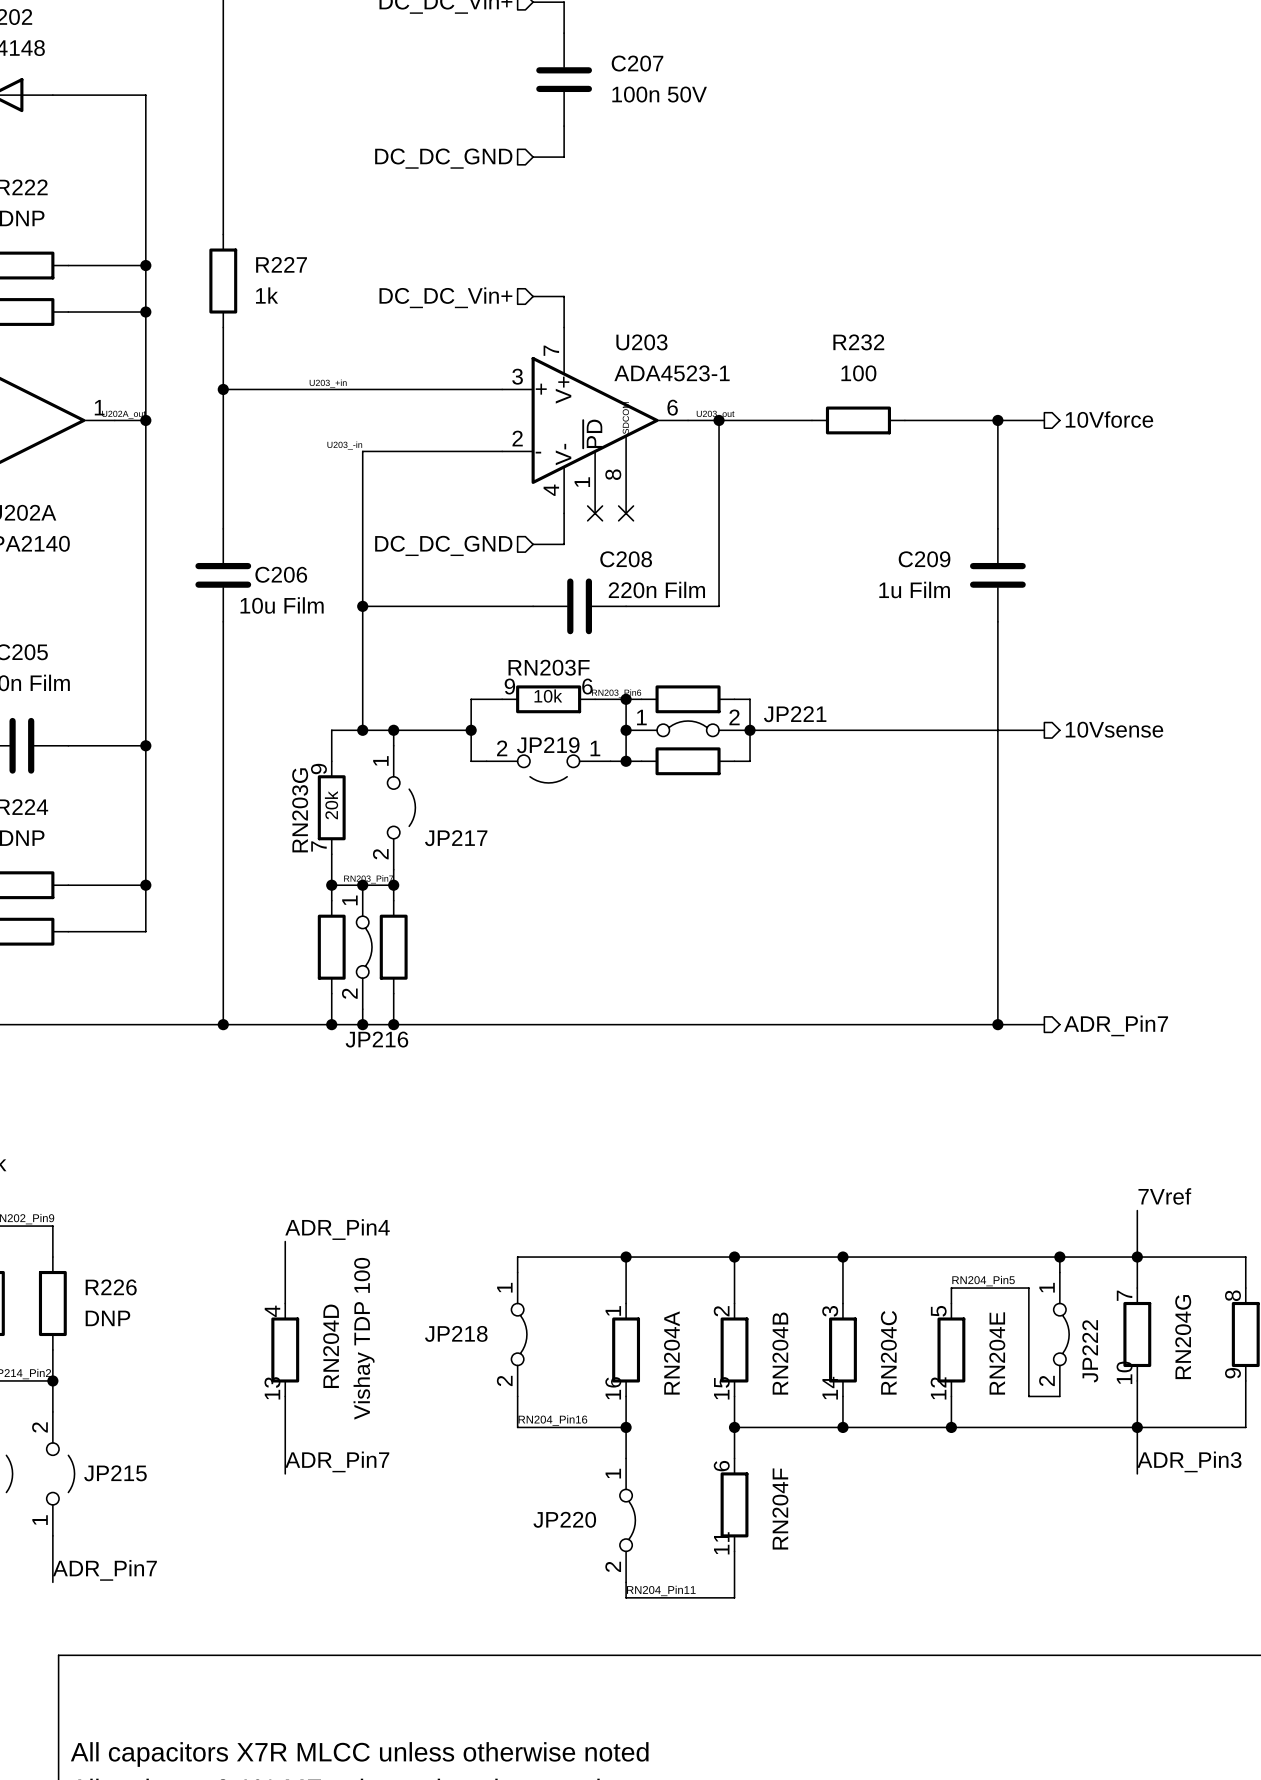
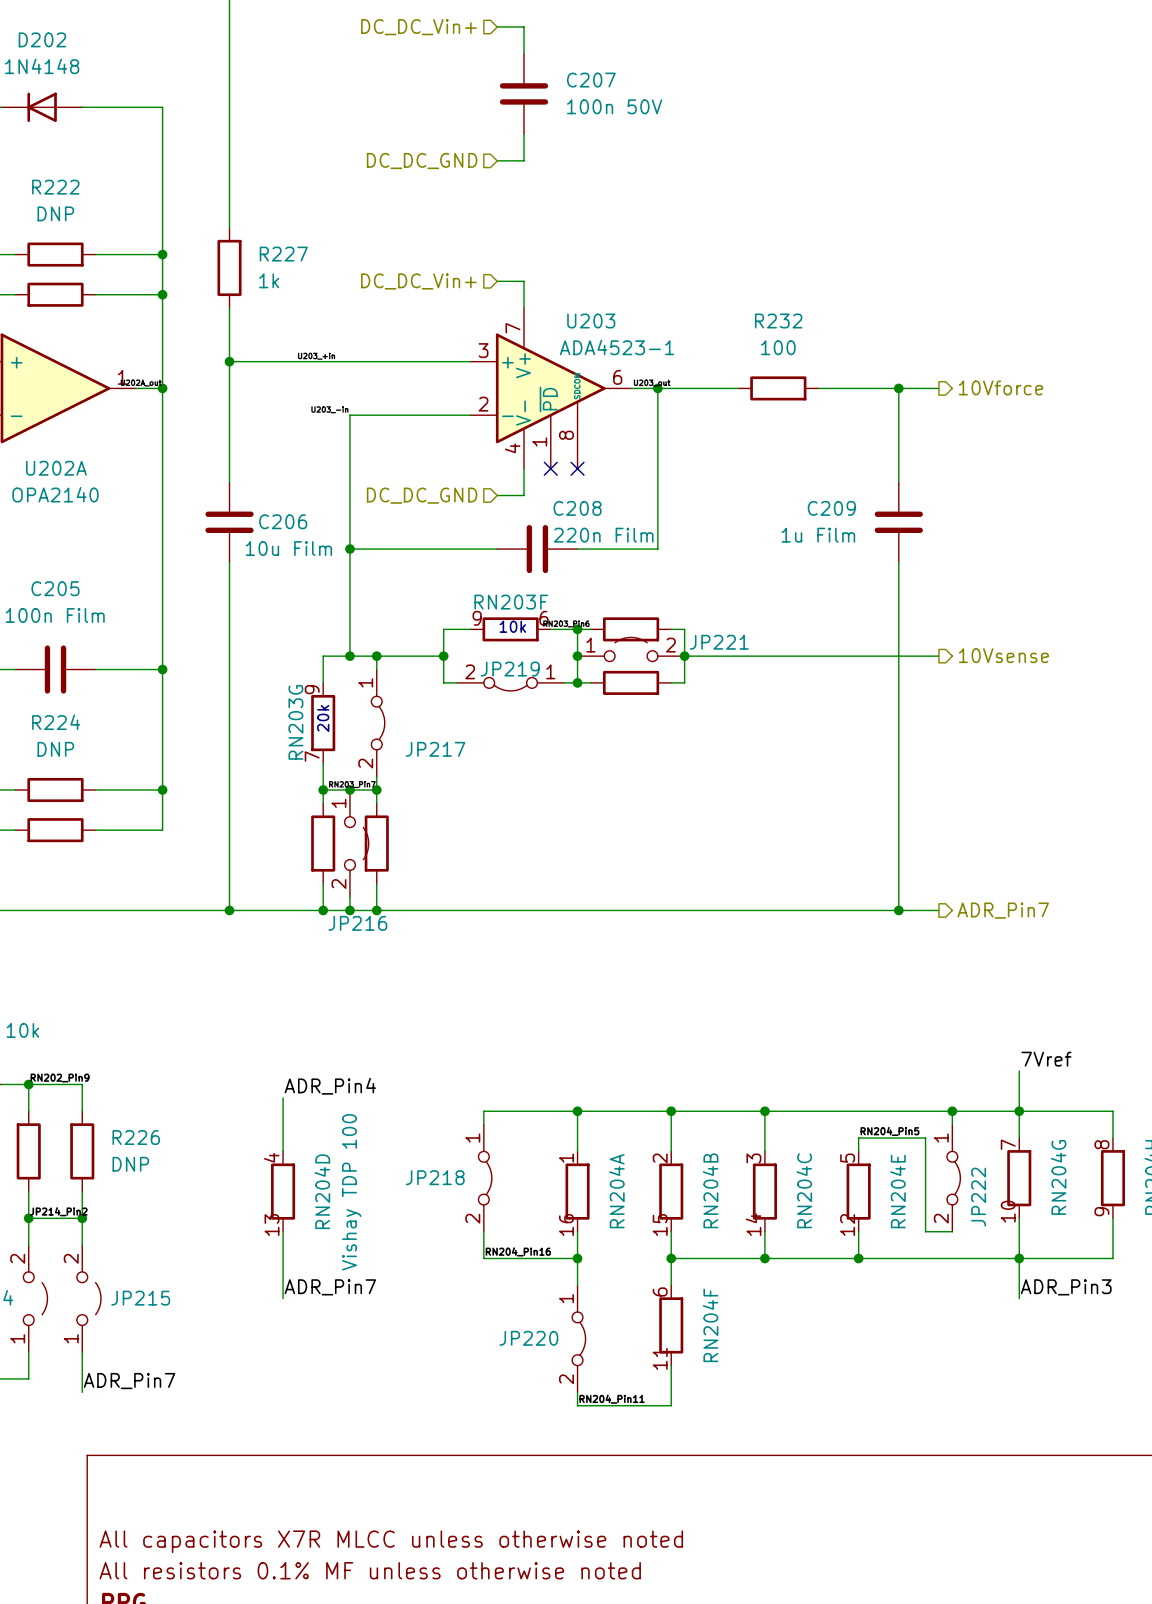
JP221 symbol: [626, 721, 751, 737] -> [577, 637, 685, 662]
JP217 symbol: [387, 745, 416, 870] -> [371, 669, 385, 777]
JP219 symbol: [486, 755, 611, 783] -> [457, 677, 565, 691]
JP216 symbol: [356, 885, 373, 1010] -> [344, 789, 369, 898]

